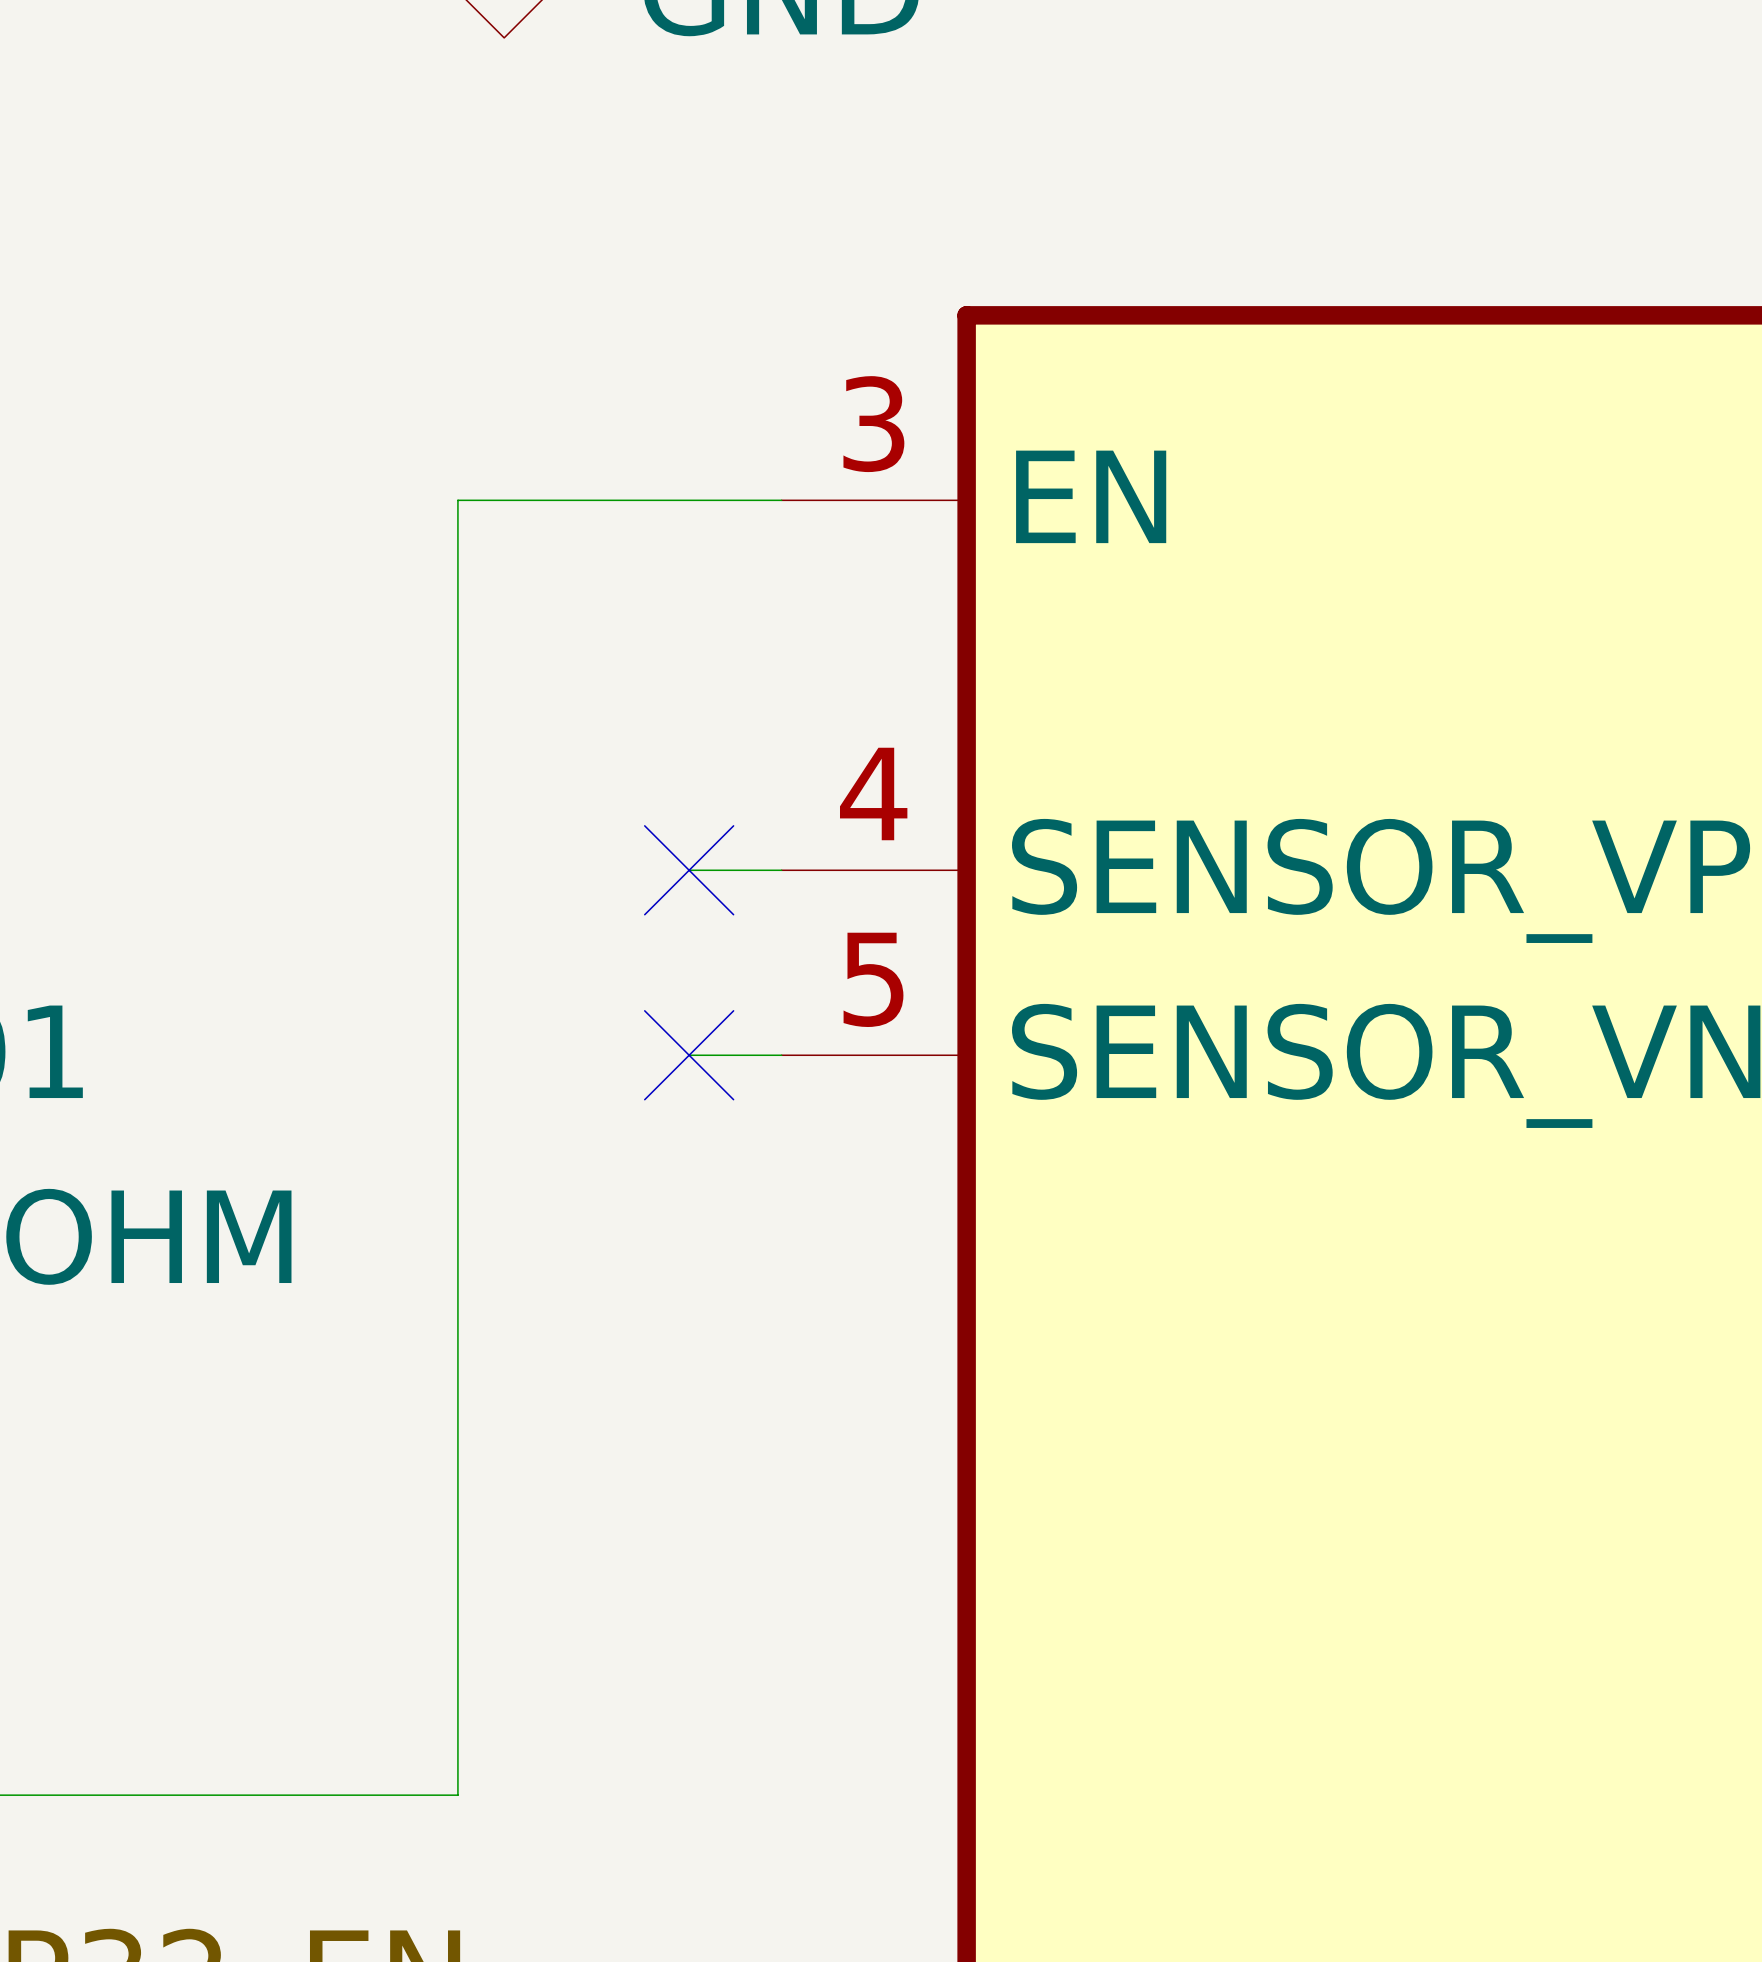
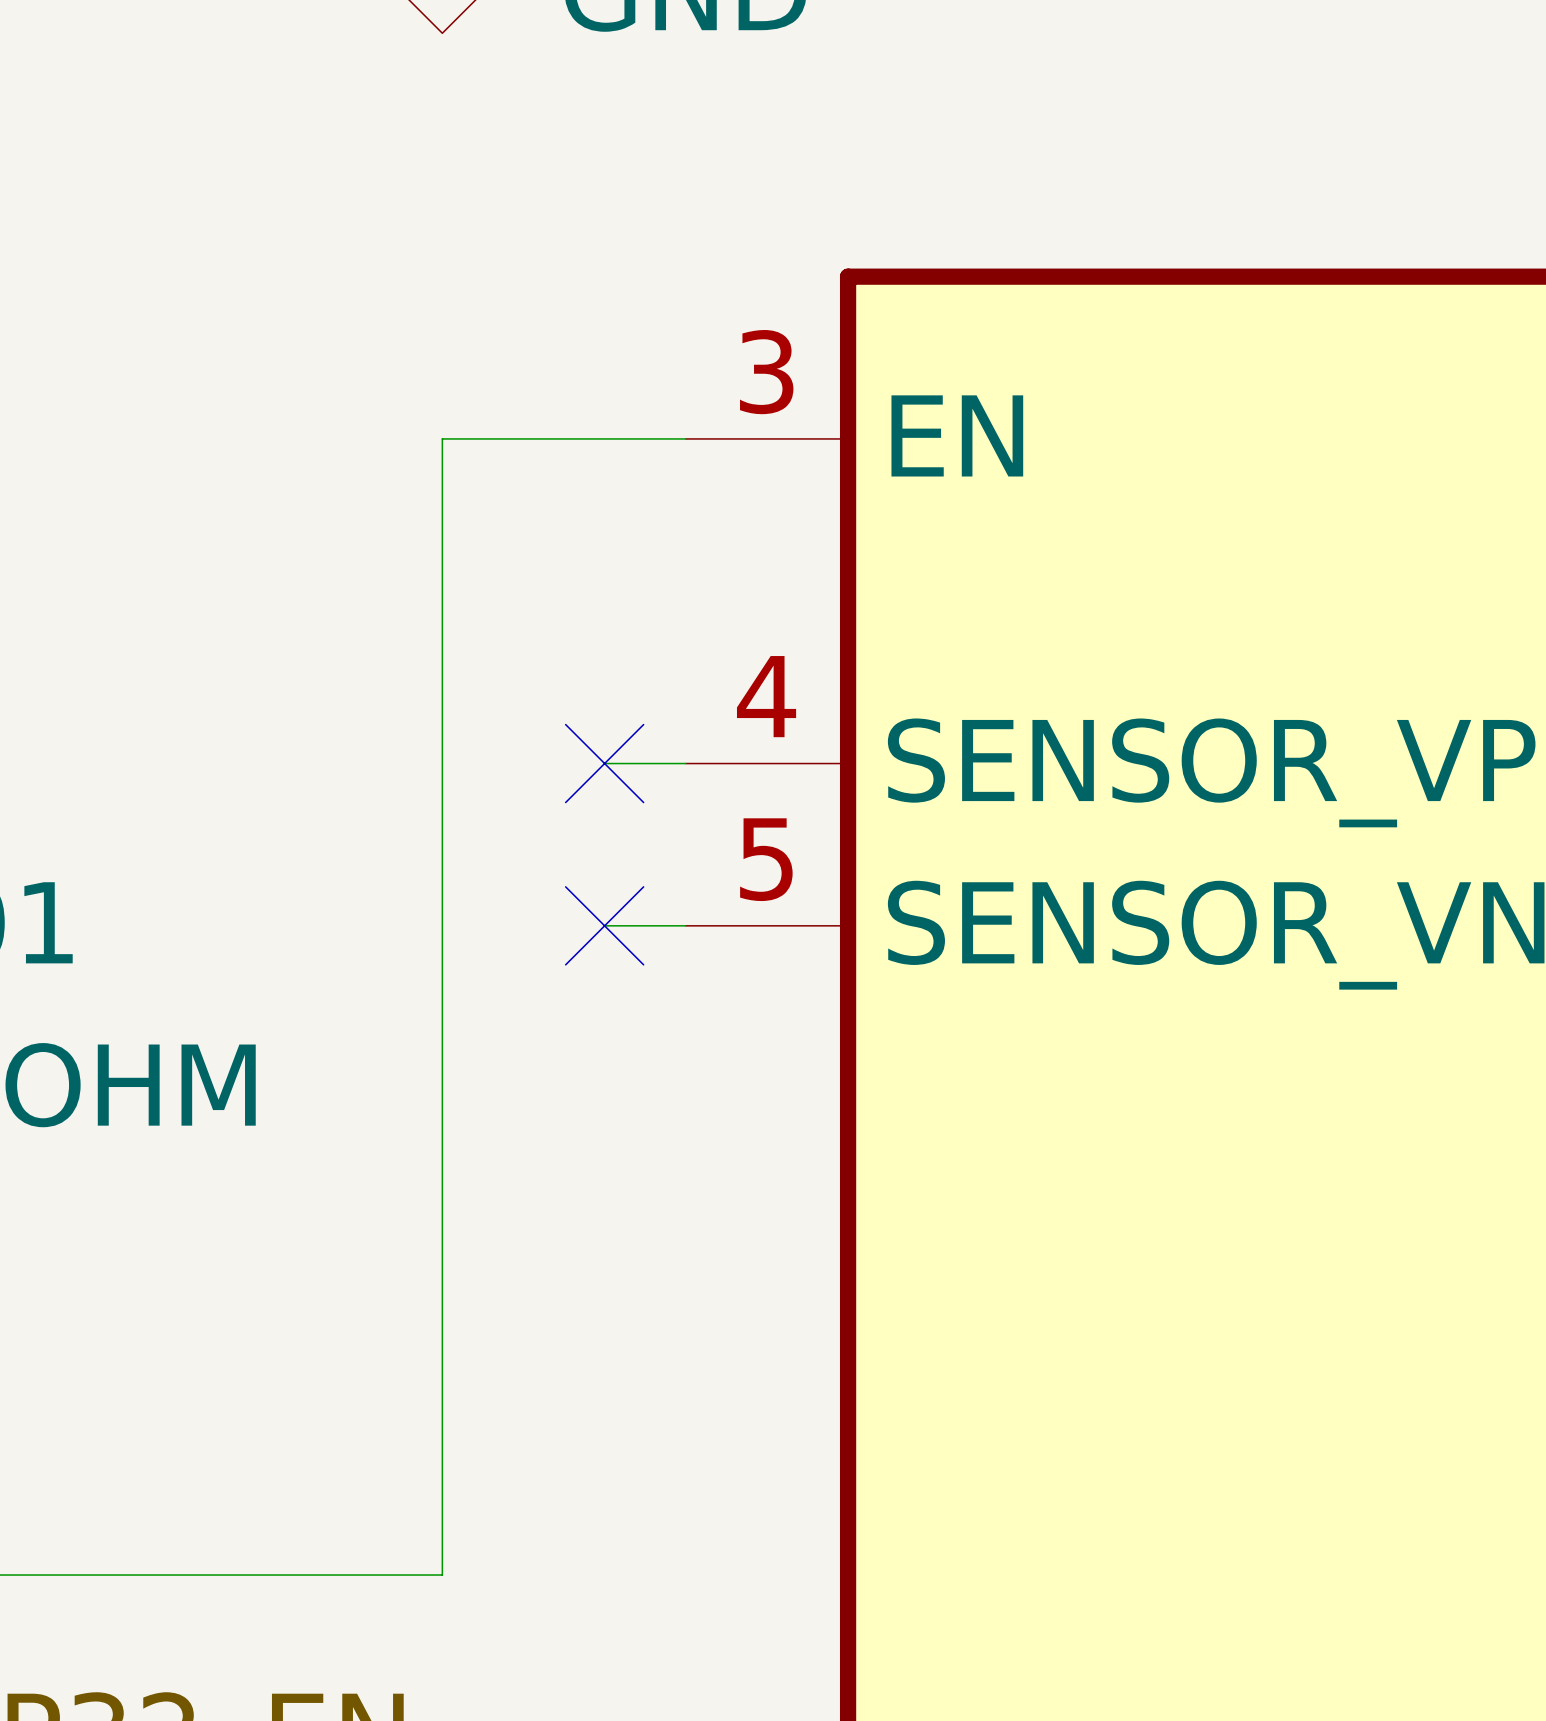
wire: (504, 500) (457, 500) (457, 1795) -> (442, 438) (442, 1575) (401, 1575)

